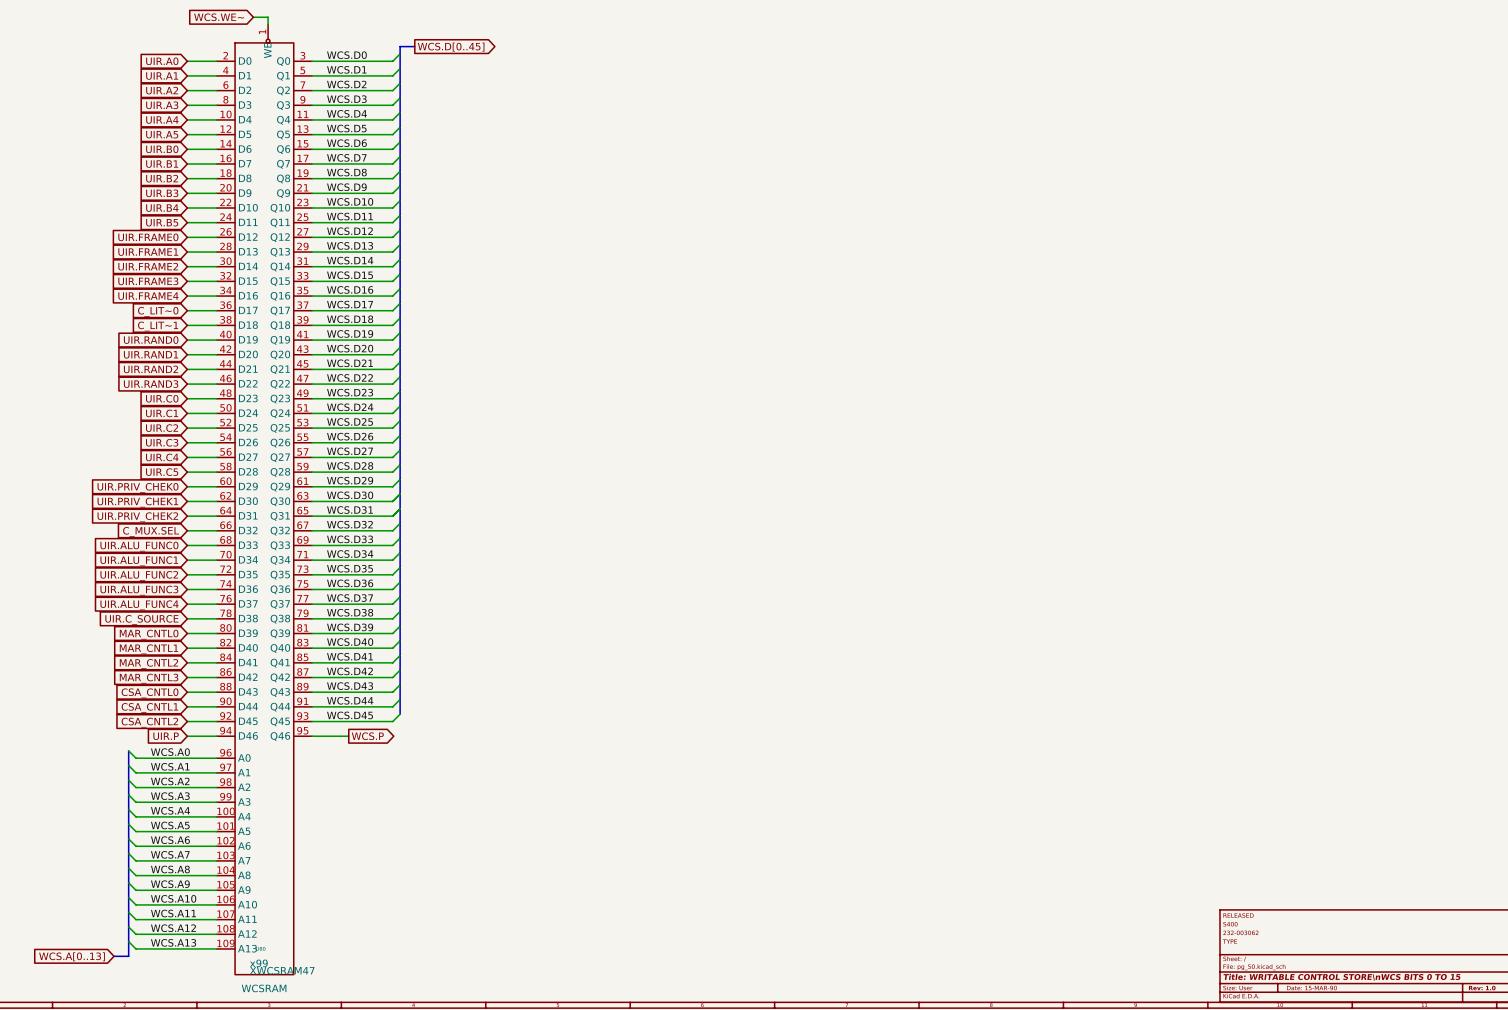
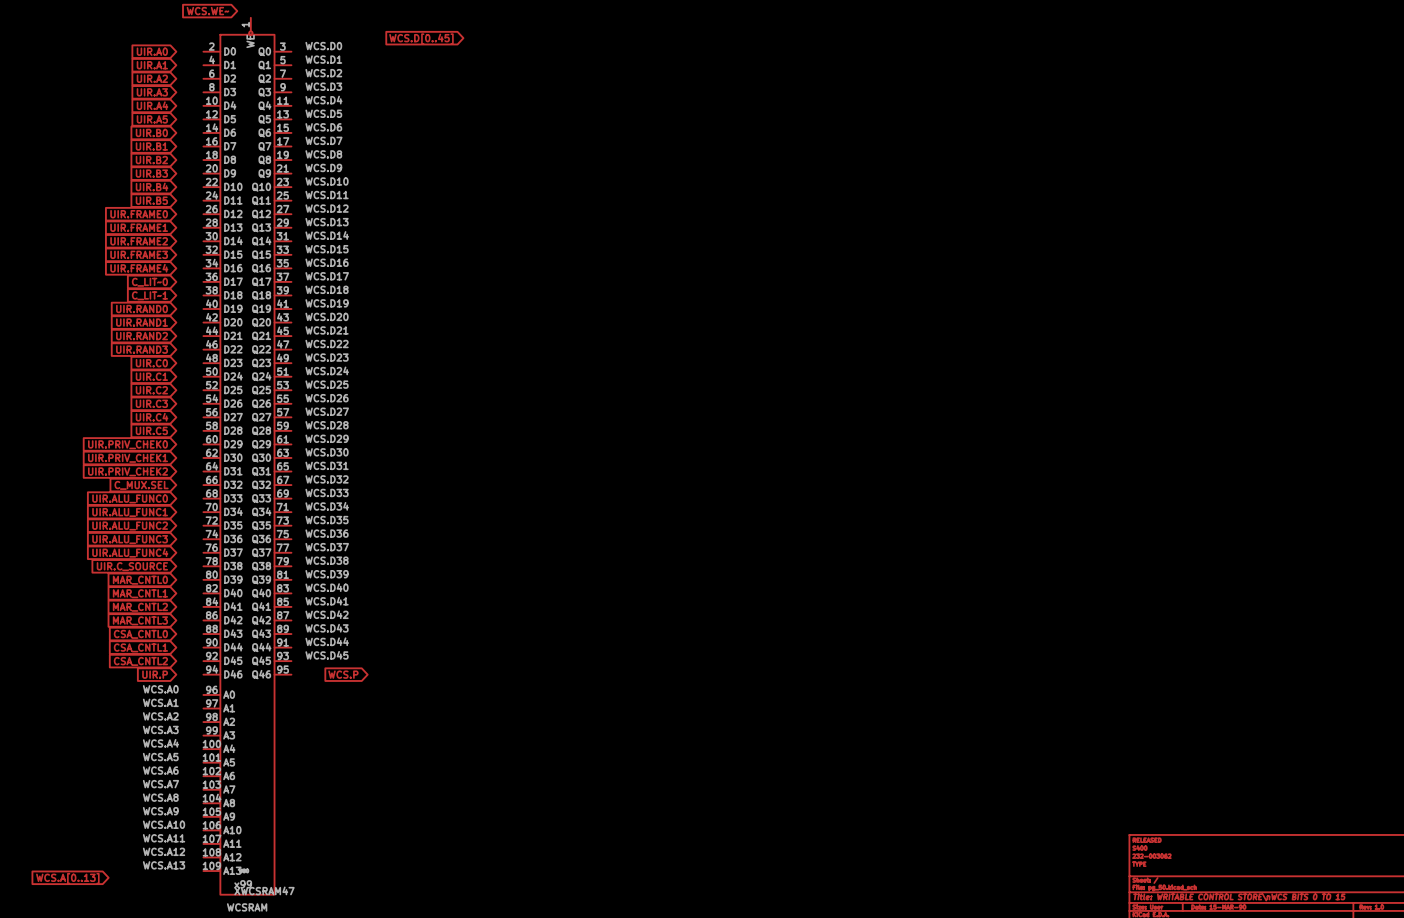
wire: (253, 17) (268, 17) (268, 24) -> none
bus: (414, 46) (400, 46) (400, 714) -> none
wire: (400, 53) (392, 61) (312, 61) -> none
wire: (187, 61) (216, 61) -> none
wire: (400, 68) (392, 75) (312, 75) -> none
wire: (187, 75) (216, 75) -> none
wire: (400, 83) (392, 90) (312, 90) -> none
wire: (187, 90) (216, 90) -> none
wire: (400, 97) (392, 105) (312, 105) -> none
wire: (187, 105) (216, 105) -> none
wire: (400, 112) (392, 119) (312, 119) -> none
wire: (187, 119) (216, 119) -> none
wire: (400, 127) (392, 134) (312, 134) -> none
wire: (187, 134) (216, 134) -> none
wire: (400, 141) (392, 149) (312, 149) -> none
wire: (187, 149) (216, 149) -> none
wire: (400, 156) (392, 163) (312, 163) -> none
wire: (187, 163) (216, 163) -> none
wire: (400, 171) (392, 178) (312, 178) -> none
wire: (187, 178) (216, 178) -> none
wire: (400, 185) (392, 193) (312, 193) -> none
wire: (187, 193) (216, 193) -> none
wire: (400, 200) (392, 208) (312, 208) -> none
wire: (187, 208) (216, 208) -> none
wire: (400, 215) (392, 222) (312, 222) -> none
wire: (187, 222) (216, 222) -> none
wire: (400, 230) (392, 237) (312, 237) -> none
wire: (187, 237) (216, 237) -> none
wire: (400, 244) (392, 252) (312, 252) -> none
wire: (187, 252) (216, 252) -> none
wire: (400, 259) (392, 266) (312, 266) -> none
wire: (187, 266) (216, 266) -> none
wire: (400, 274) (392, 281) (312, 281) -> none
wire: (187, 281) (216, 281) -> none
wire: (400, 288) (392, 296) (312, 296) -> none
wire: (187, 296) (216, 296) -> none
wire: (400, 303) (392, 310) (312, 310) -> none
wire: (187, 310) (216, 310) -> none
wire: (400, 318) (392, 325) (312, 325) -> none
wire: (187, 325) (216, 325) -> none
wire: (400, 332) (392, 340) (312, 340) -> none
wire: (187, 340) (216, 340) -> none
wire: (400, 347) (392, 354) (312, 354) -> none
wire: (187, 354) (216, 354) -> none
wire: (400, 362) (392, 369) (312, 369) -> none
wire: (187, 369) (216, 369) -> none
wire: (400, 376) (392, 384) (312, 384) -> none
wire: (187, 384) (216, 384) -> none
wire: (400, 391) (392, 398) (312, 398) -> none
wire: (187, 398) (216, 398) -> none
wire: (400, 406) (392, 413) (312, 413) -> none
wire: (187, 413) (216, 413) -> none
wire: (400, 420) (392, 428) (312, 428) -> none
wire: (187, 428) (216, 428) -> none
wire: (400, 435) (392, 442) (312, 442) -> none
wire: (187, 442) (216, 442) -> none
wire: (400, 450) (392, 457) (312, 457) -> none
wire: (187, 457) (216, 457) -> none
wire: (400, 464) (392, 472) (312, 472) -> none
wire: (187, 472) (216, 472) -> none
wire: (400, 479) (392, 486) (312, 486) -> none
wire: (187, 486) (216, 486) -> none
wire: (400, 494) (392, 501) (312, 501) -> none
wire: (187, 501) (216, 501) -> none
wire: (400, 508) (392, 516) (312, 516) -> none
wire: (187, 516) (216, 516) -> none
wire: (400, 523) (392, 530) (312, 530) -> none
wire: (187, 530) (216, 530) -> none
wire: (400, 538) (392, 545) (312, 545) -> none
wire: (187, 545) (216, 545) -> none
wire: (400, 552) (392, 560) (312, 560) -> none
wire: (187, 560) (216, 560) -> none
wire: (400, 567) (392, 574) (312, 574) -> none
wire: (187, 574) (216, 574) -> none
wire: (400, 582) (392, 589) (312, 589) -> none
wire: (187, 589) (216, 589) -> none
wire: (400, 596) (392, 604) (312, 604) -> none
wire: (187, 604) (216, 604) -> none
wire: (400, 611) (392, 618) (312, 618) -> none
wire: (187, 618) (216, 618) -> none
wire: (400, 626) (392, 633) (312, 633) -> none
wire: (187, 633) (216, 633) -> none
wire: (400, 640) (392, 648) (312, 648) -> none
wire: (187, 648) (216, 648) -> none
wire: (400, 655) (392, 662) (312, 662) -> none
wire: (187, 662) (216, 662) -> none
wire: (400, 670) (392, 677) (312, 677) -> none
wire: (187, 677) (216, 677) -> none
wire: (400, 684) (392, 692) (312, 692) -> none
wire: (187, 692) (216, 692) -> none
wire: (400, 699) (392, 706) (312, 706) -> none
wire: (187, 706) (216, 706) -> none
wire: (400, 714) (392, 721) (312, 721) -> none
wire: (187, 721) (216, 721) -> none
wire: (187, 736) (216, 736) -> none
wire: (312, 736) (348, 736) -> none
wire: (128, 750) (136, 758) (216, 758) -> none
bus: (128, 750) (128, 956) (114, 956) -> none
wire: (128, 765) (136, 772) (216, 772) -> none
wire: (128, 780) (136, 787) (216, 787) -> none
wire: (128, 794) (136, 802) (216, 802) -> none
wire: (128, 809) (136, 816) (216, 816) -> none
wire: (128, 824) (136, 831) (216, 831) -> none
wire: (128, 838) (136, 846) (216, 846) -> none
wire: (128, 853) (136, 860) (216, 860) -> none
wire: (128, 868) (136, 875) (216, 875) -> none
wire: (128, 882) (136, 890) (216, 890) -> none
wire: (128, 897) (136, 904) (216, 904) -> none
wire: (128, 912) (136, 919) (216, 919) -> none
wire: (128, 926) (136, 934) (216, 934) -> none
wire: (128, 941) (136, 948) (216, 948) -> none

